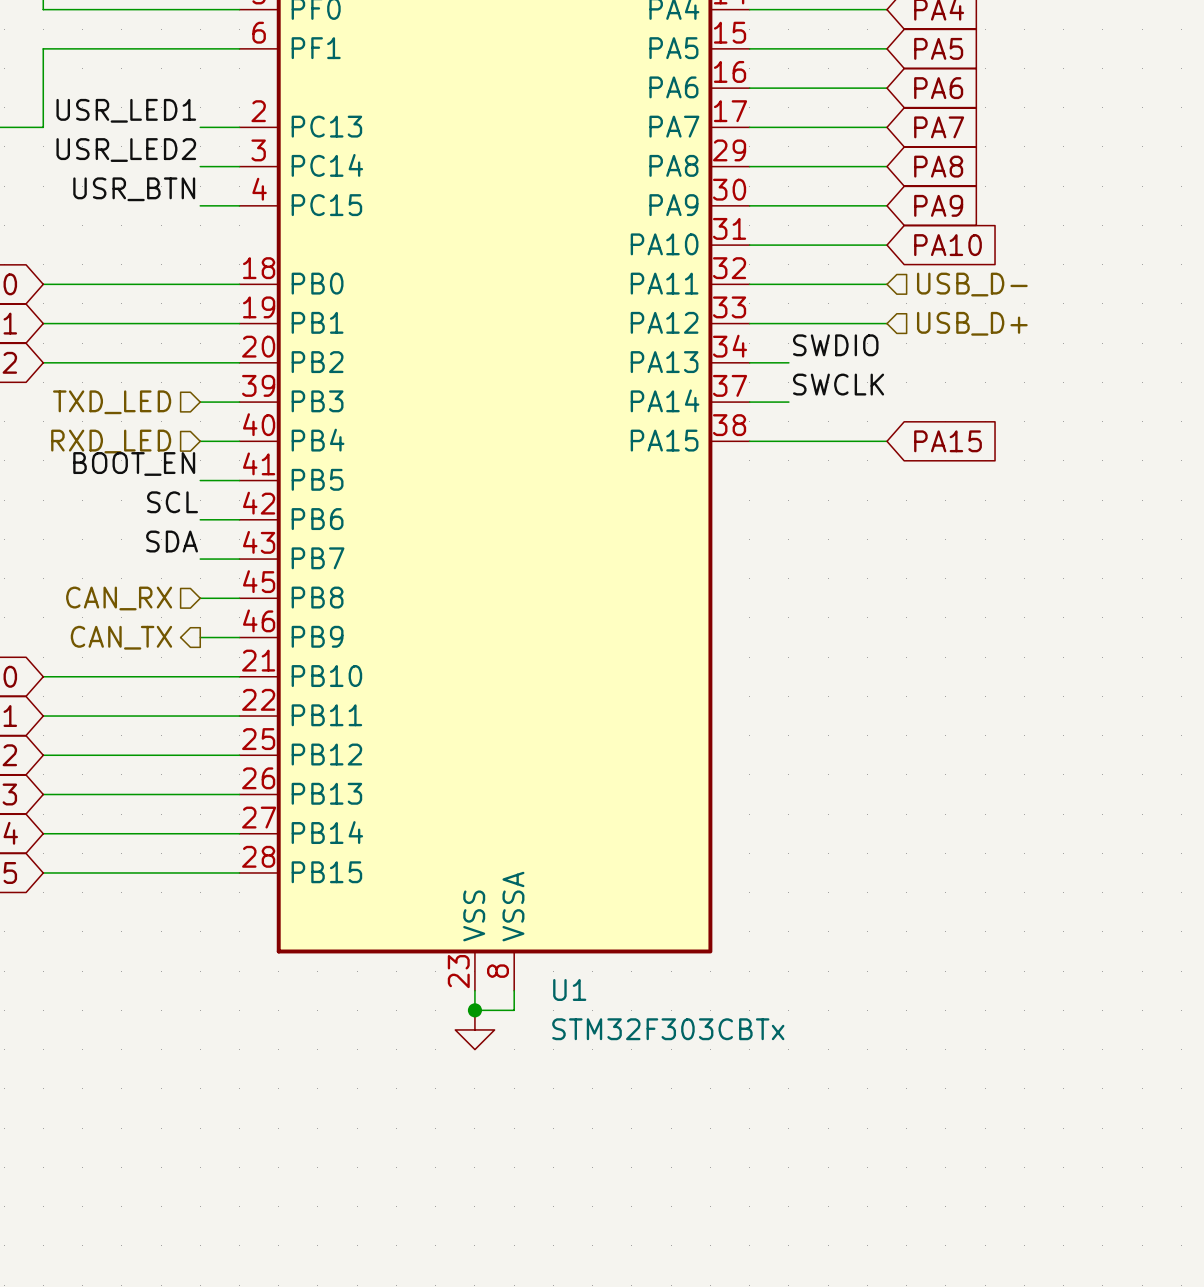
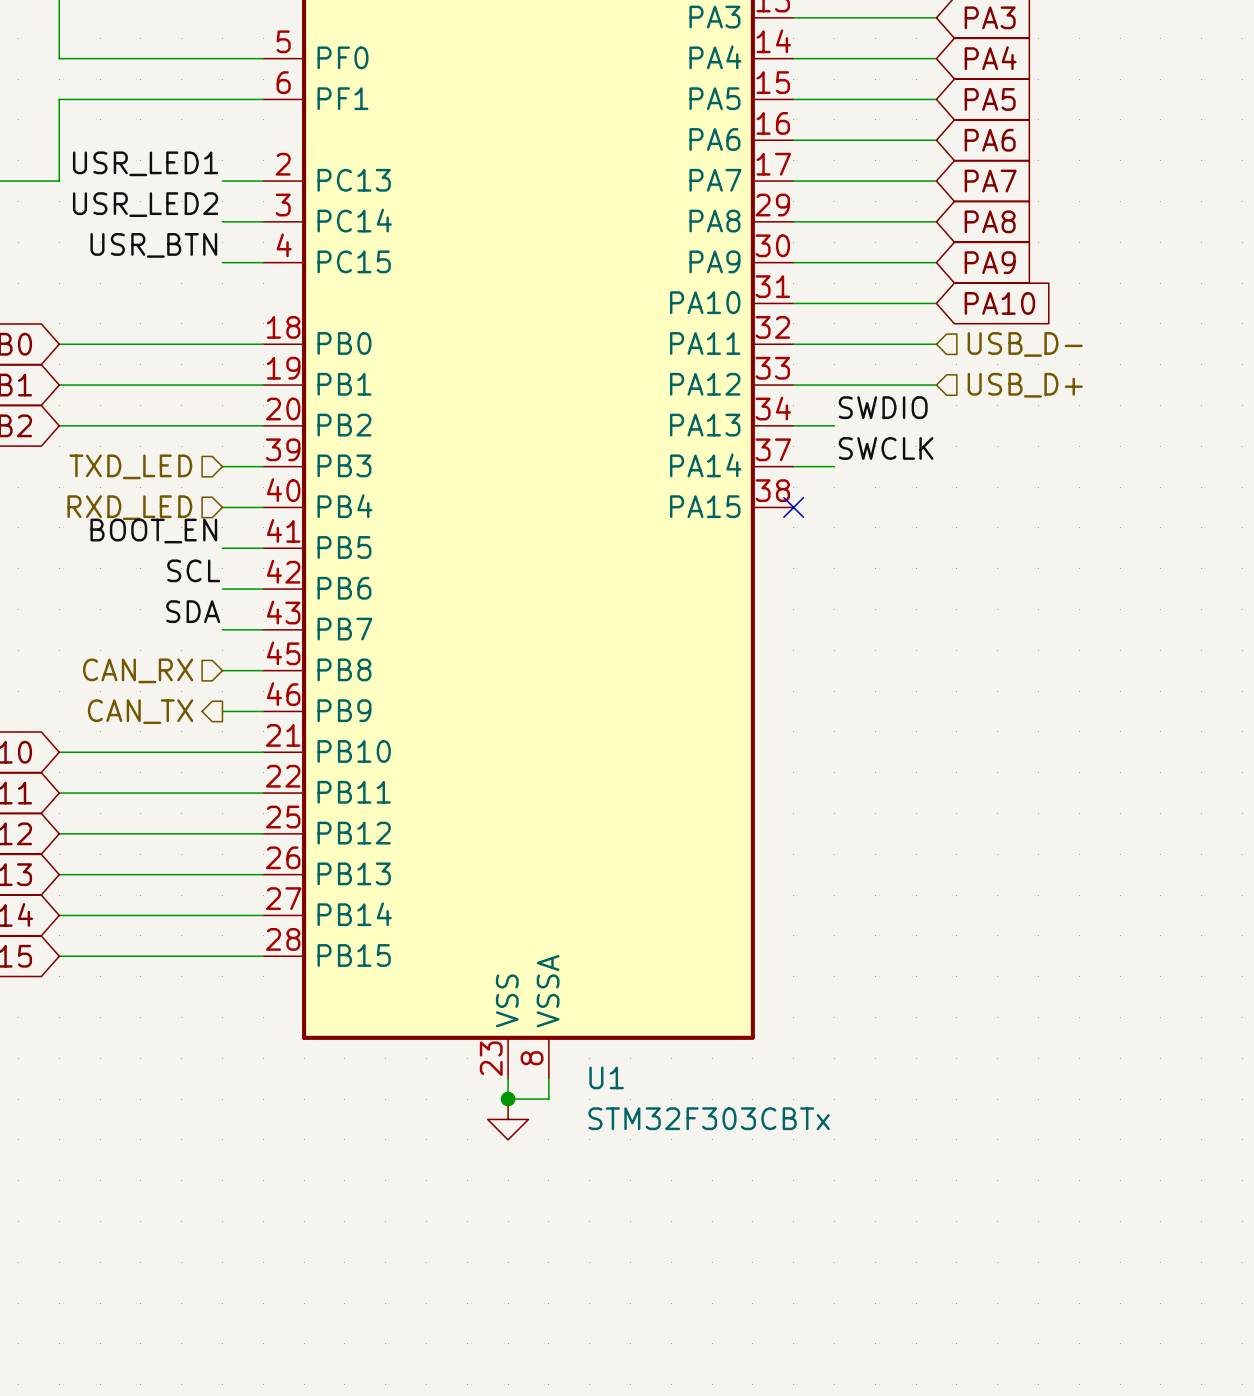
wire: (749, 441) (887, 441) -> none
no-connect mark: none -> (793, 507)
global label: PA15 (948, 441) -> none

